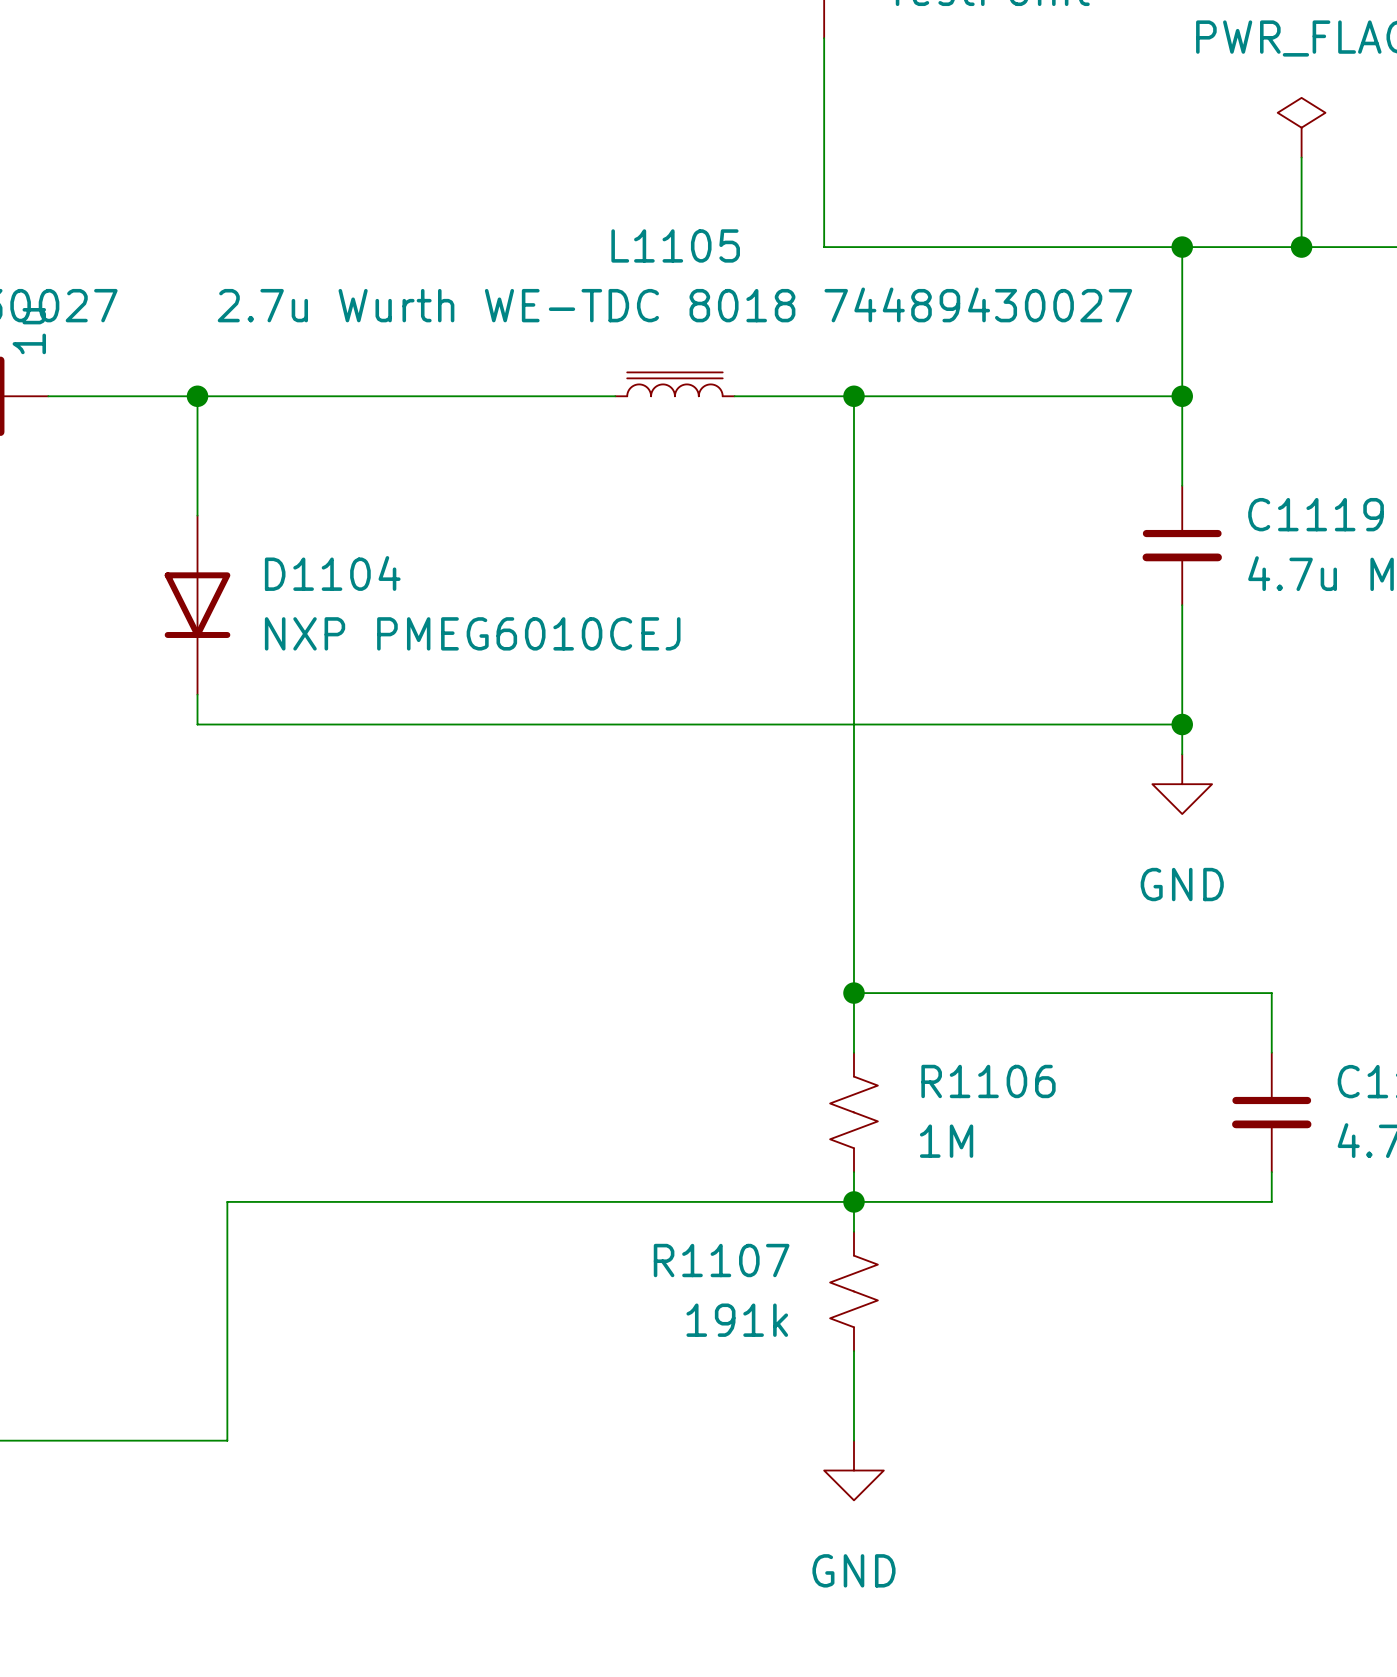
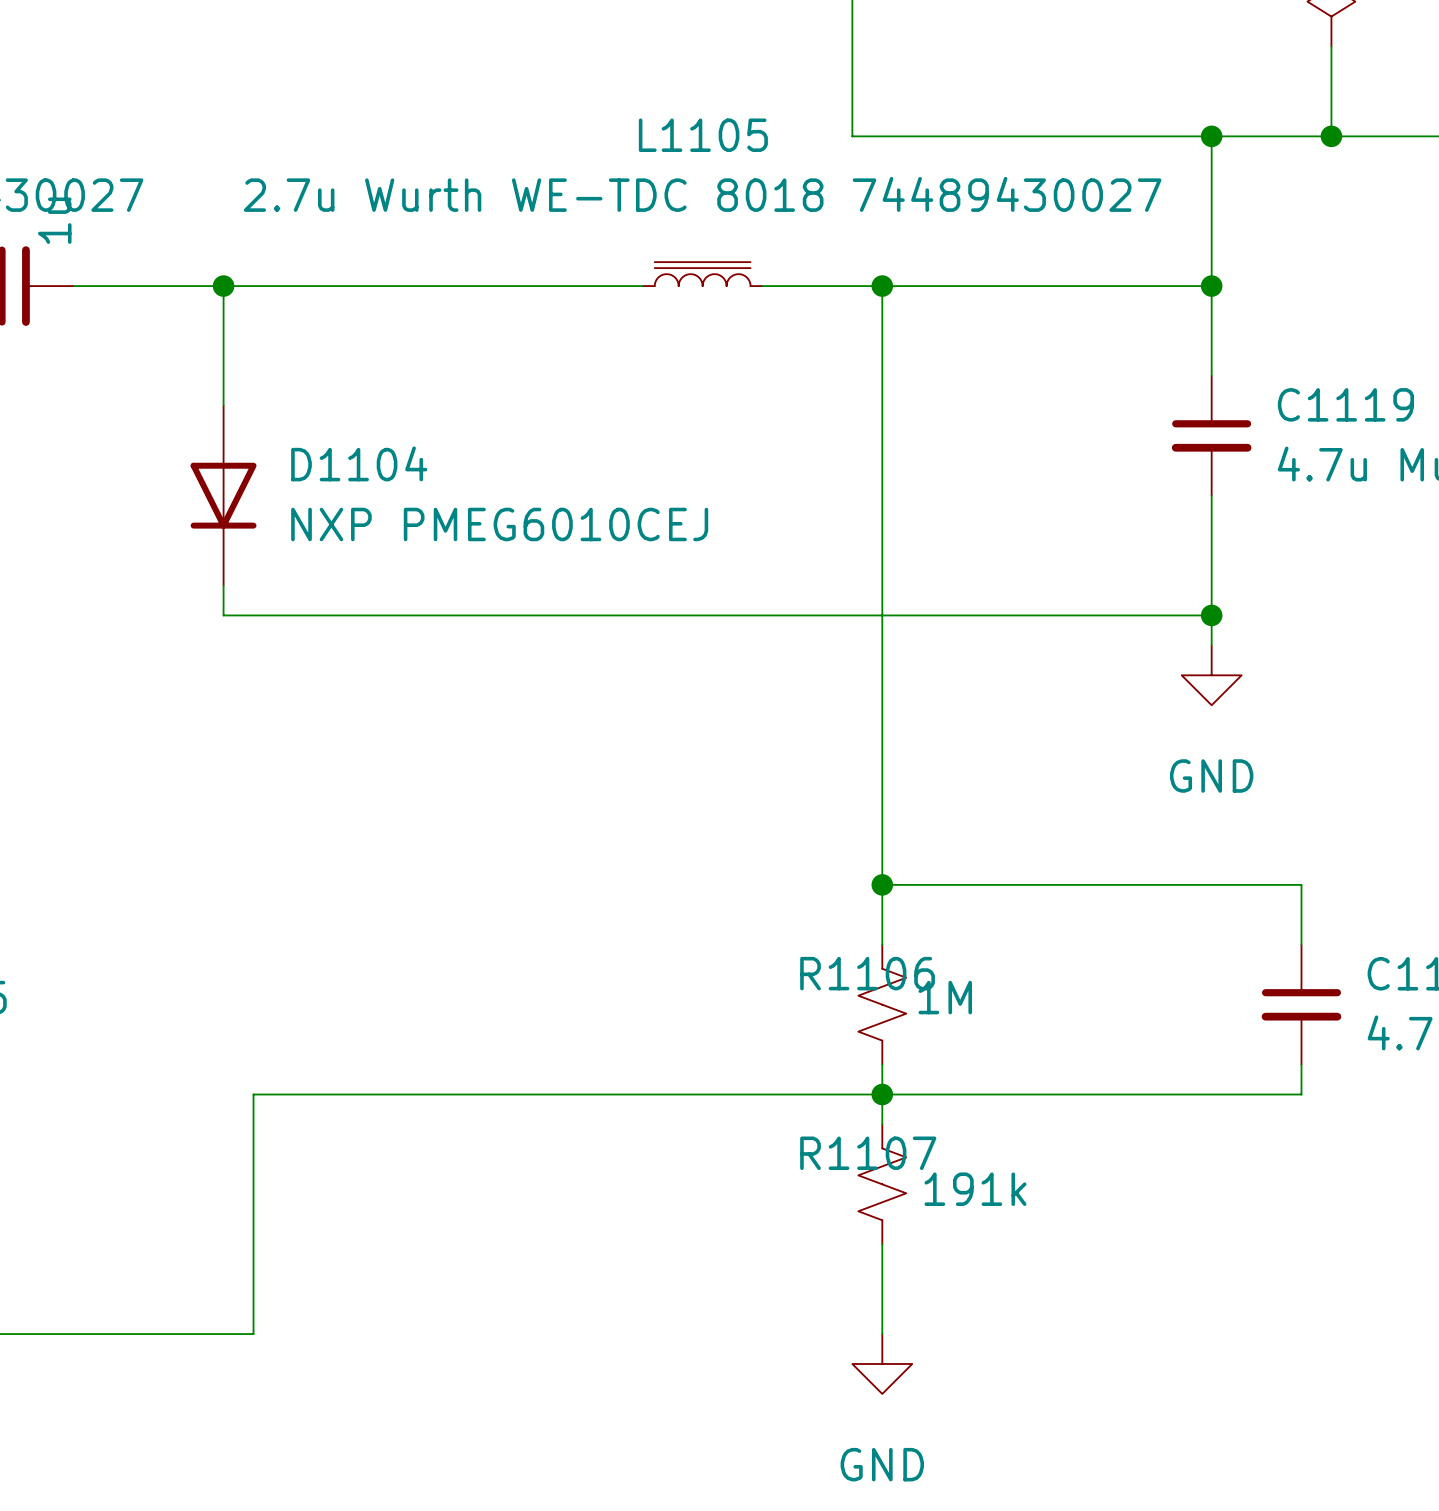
R1106 name position: R1106 (988, 1081) -> R1106 (867, 973)
R1106 value position: 1M (946, 1141) -> 1M (945, 997)
R1107 name position: R1107 (721, 1260) -> R1107 (868, 1153)
R1107 value position: 191k (737, 1320) -> 191k (975, 1189)

